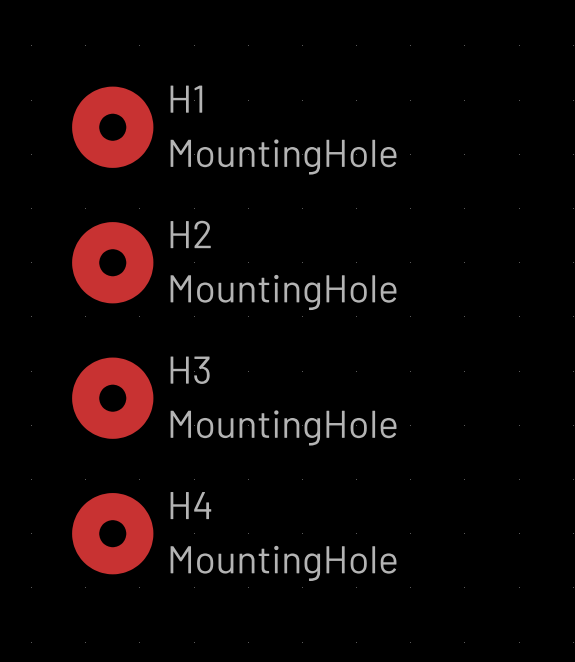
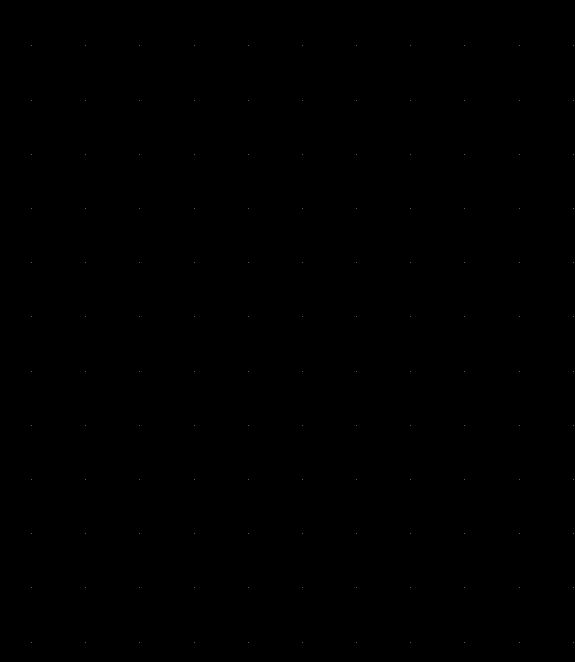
H1: MountingHole (112, 127) -> none
H2: MountingHole (112, 262) -> none
H3: MountingHole (112, 398) -> none
H4: MountingHole (112, 533) -> none

